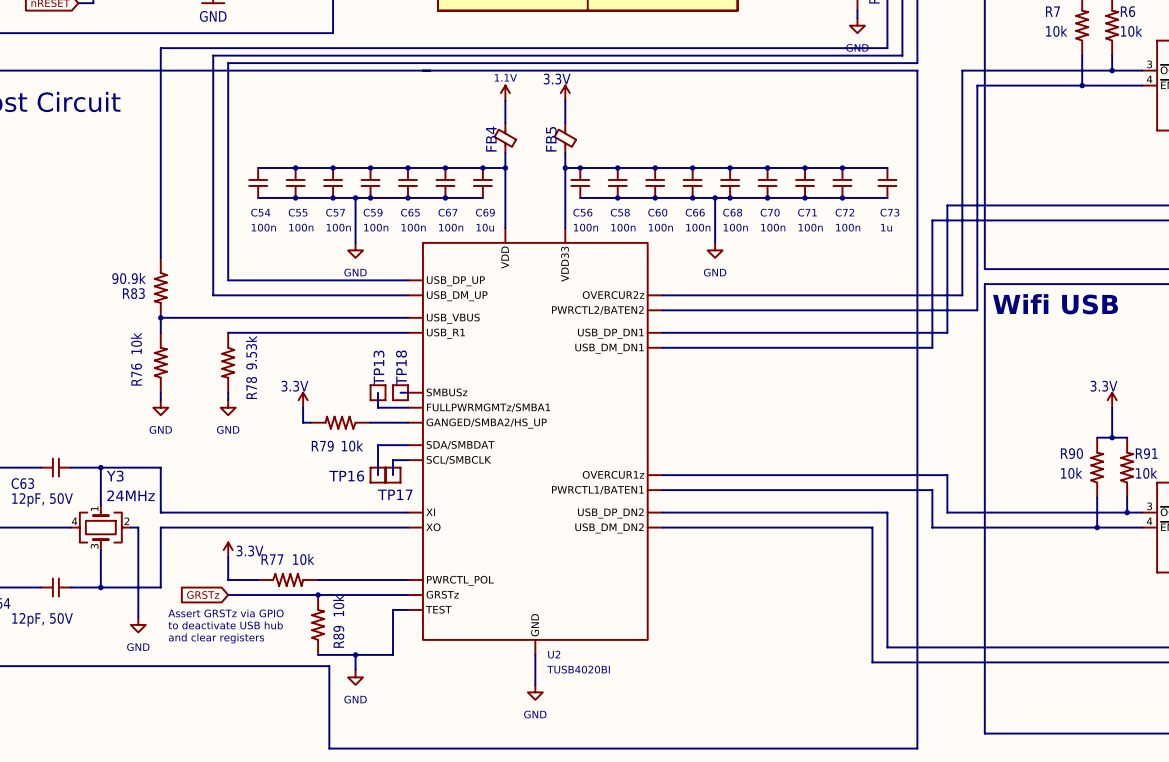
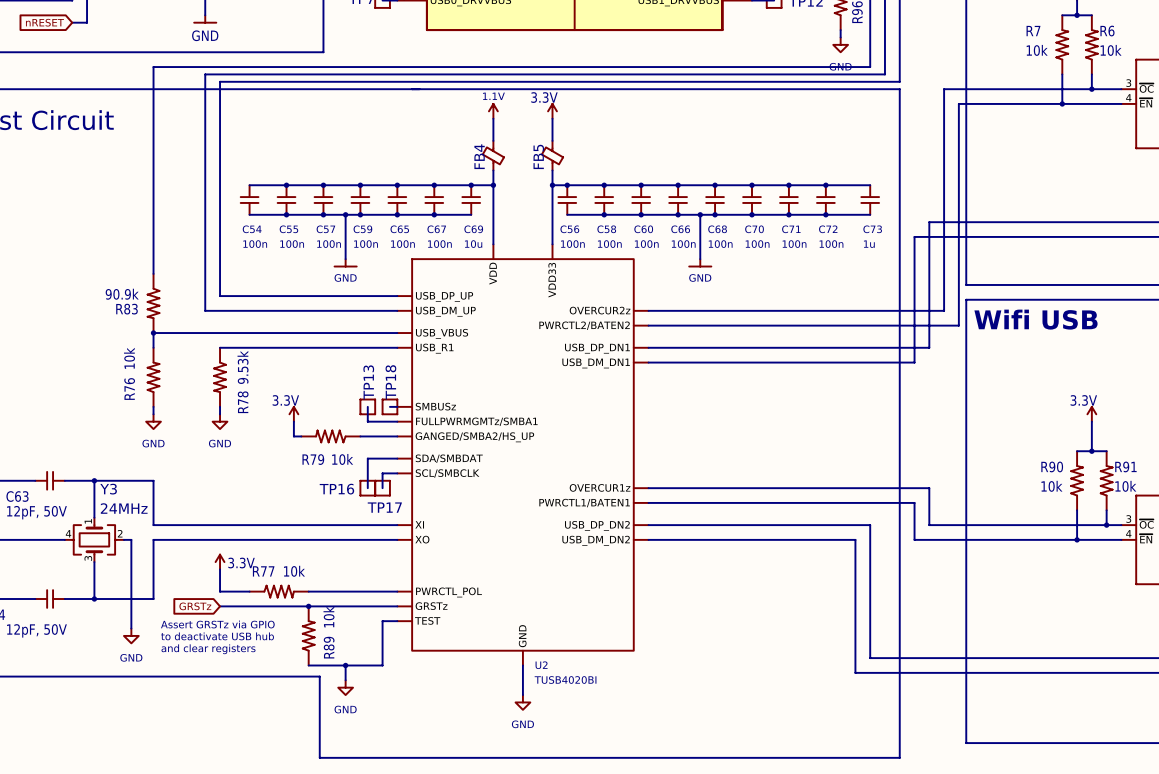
power symbol shape: [348, 242, 364, 258] -> [333, 259, 358, 268]
power symbol shape: [707, 242, 723, 258] -> [688, 259, 713, 268]

